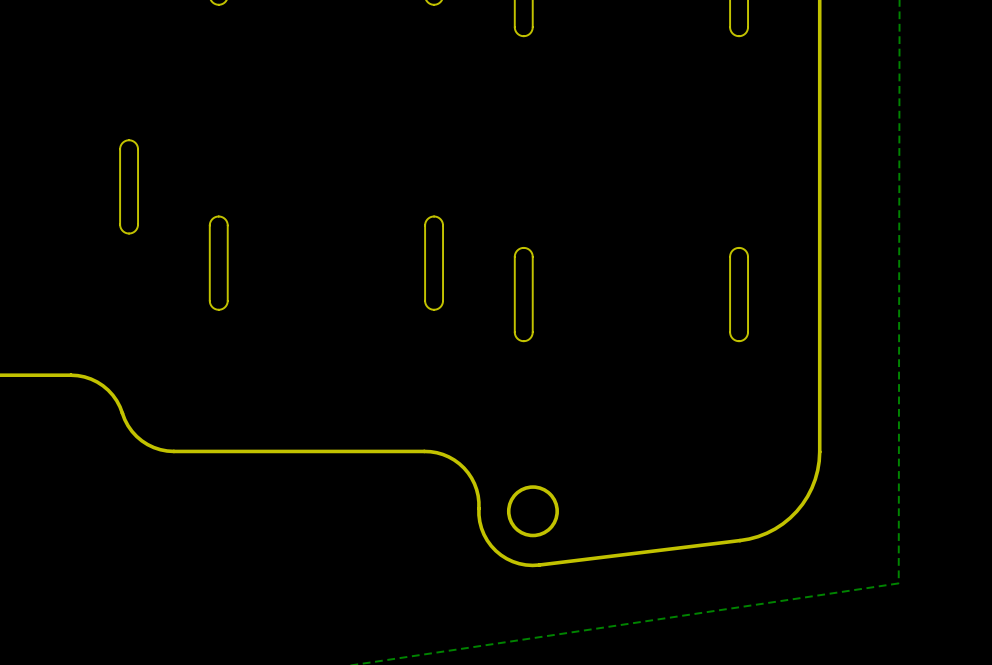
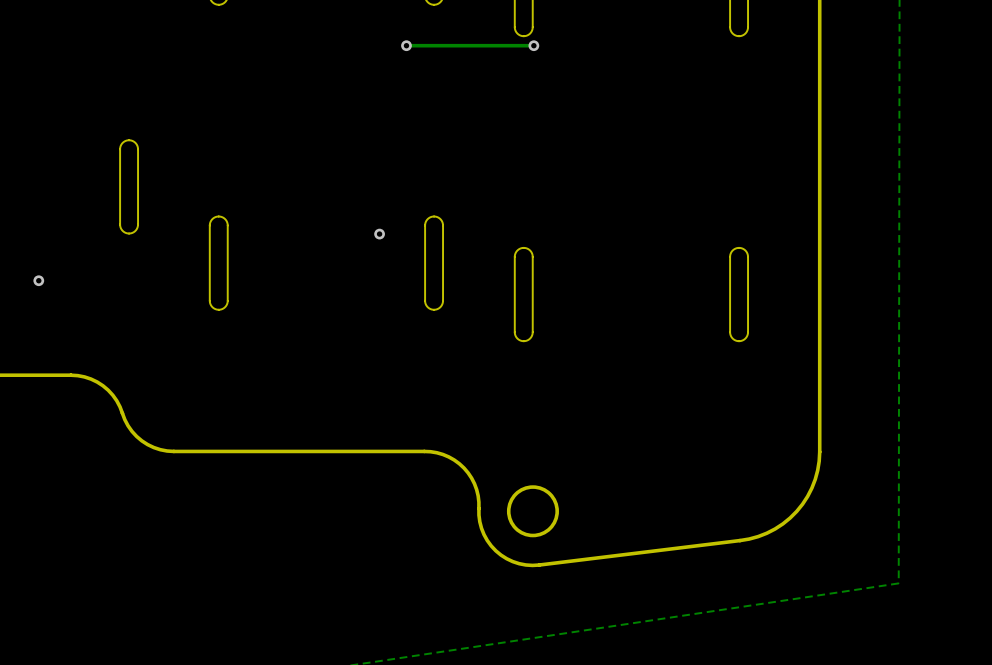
via: none -> (406, 45)
track: none -> (533, 45) (406, 45)
via: none -> (533, 45)
via: none -> (379, 234)
via: none -> (38, 280)

